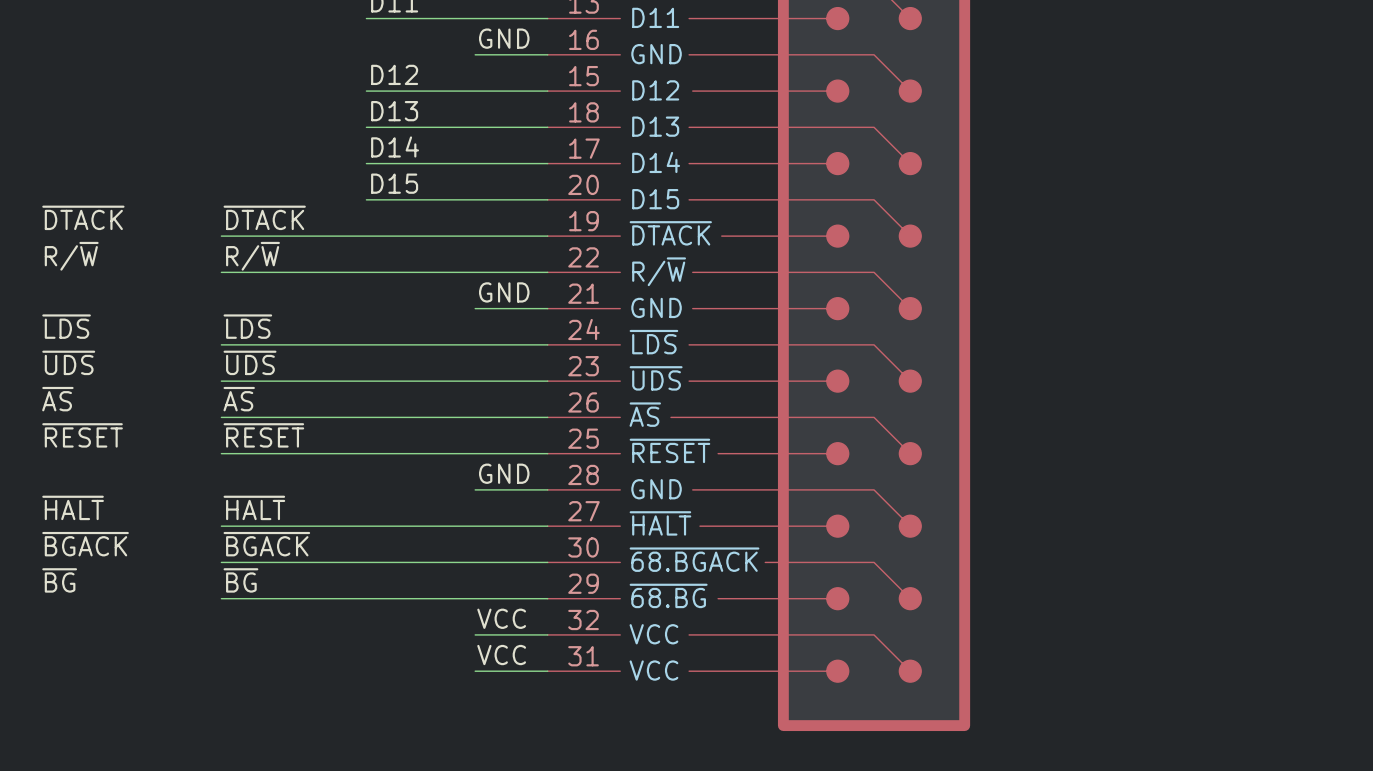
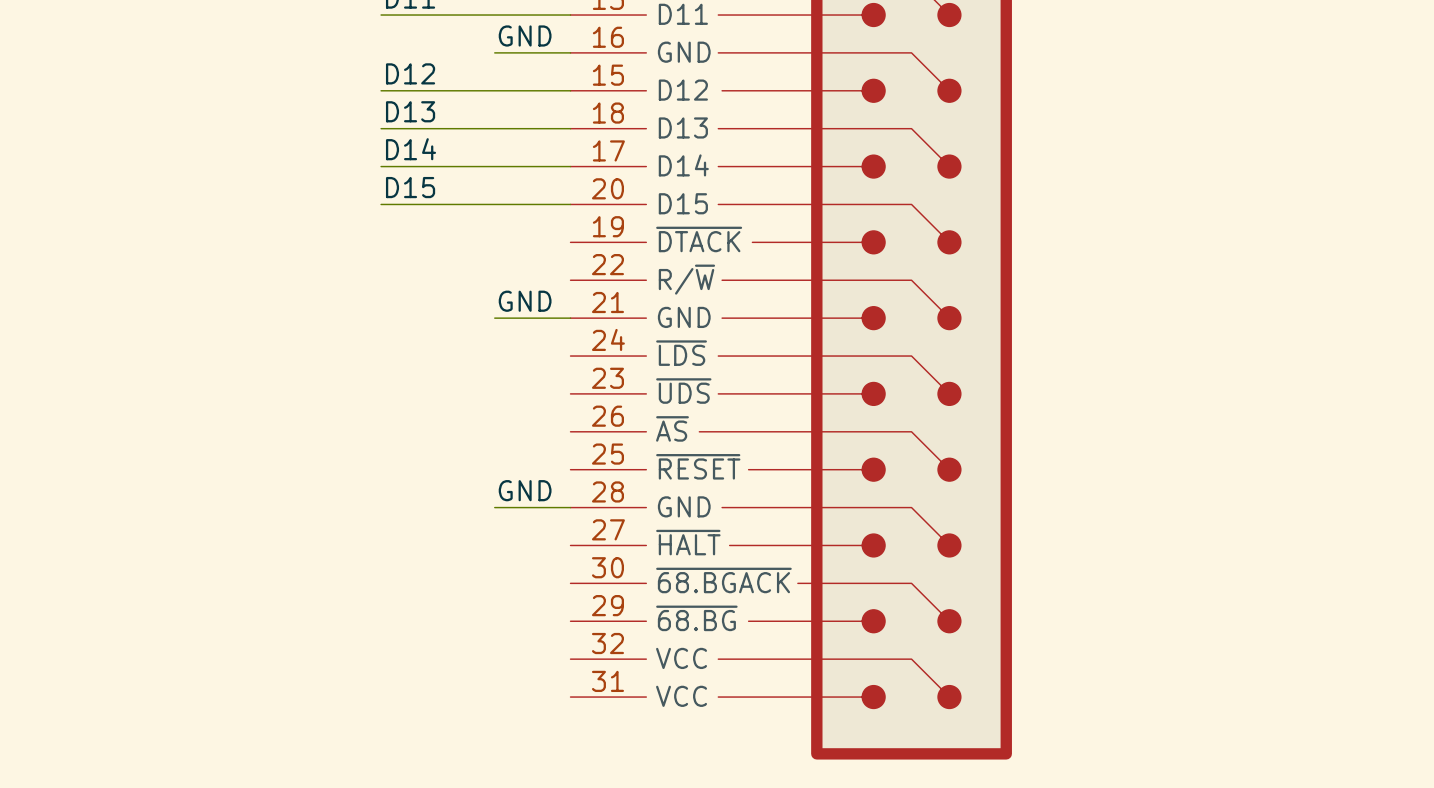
label: ~{DTACK} (83, 217) -> none
label: ~{DTACK} (264, 217) -> none
wire: (221, 236) (547, 236) -> none
label: R/~{W} (71, 256) -> none
label: R/~{W} (252, 256) -> none
wire: (221, 272) (547, 272) -> none
label: ~{LDS} (66, 326) -> none
label: ~{LDS} (247, 326) -> none
wire: (221, 344) (547, 344) -> none
label: ~{UDS} (68, 362) -> none
label: ~{UDS} (250, 362) -> none
wire: (221, 381) (547, 381) -> none
label: ~{AS} (57, 399) -> none
label: ~{AS} (239, 399) -> none
wire: (221, 417) (547, 417) -> none
label: ~{RESET} (82, 435) -> none
label: ~{RESET} (263, 435) -> none
wire: (221, 453) (547, 453) -> none
label: ~{HALT} (73, 507) -> none
label: ~{HALT} (254, 507) -> none
wire: (221, 526) (547, 526) -> none
label: ~{BGACK} (85, 544) -> none
label: ~{BGACK} (266, 544) -> none
wire: (221, 562) (547, 562) -> none
label: ~{BG} (59, 580) -> none
label: ~{BG} (240, 580) -> none
wire: (221, 598) (547, 598) -> none
label: VCC (501, 618) -> none
wire: (475, 634) (547, 634) -> none
label: VCC (501, 655) -> none
wire: (475, 671) (547, 671) -> none

